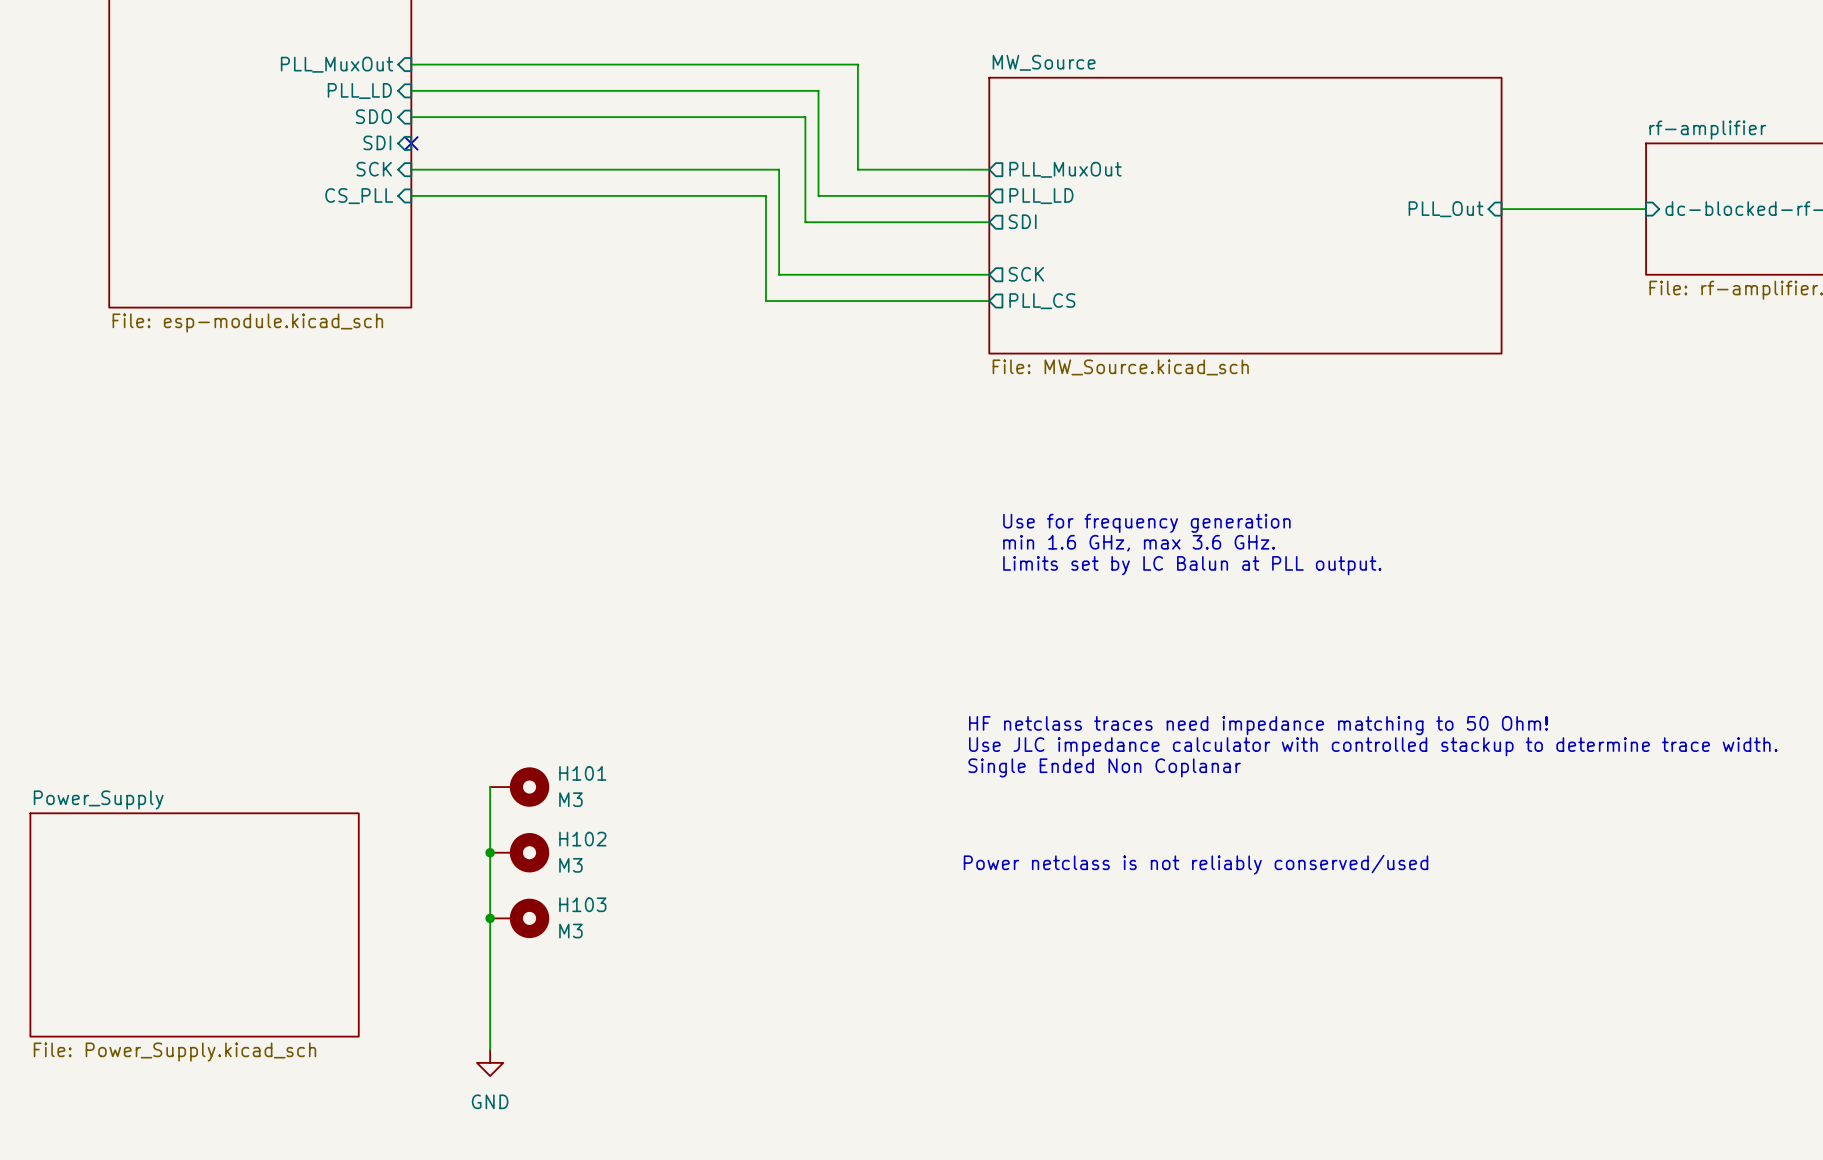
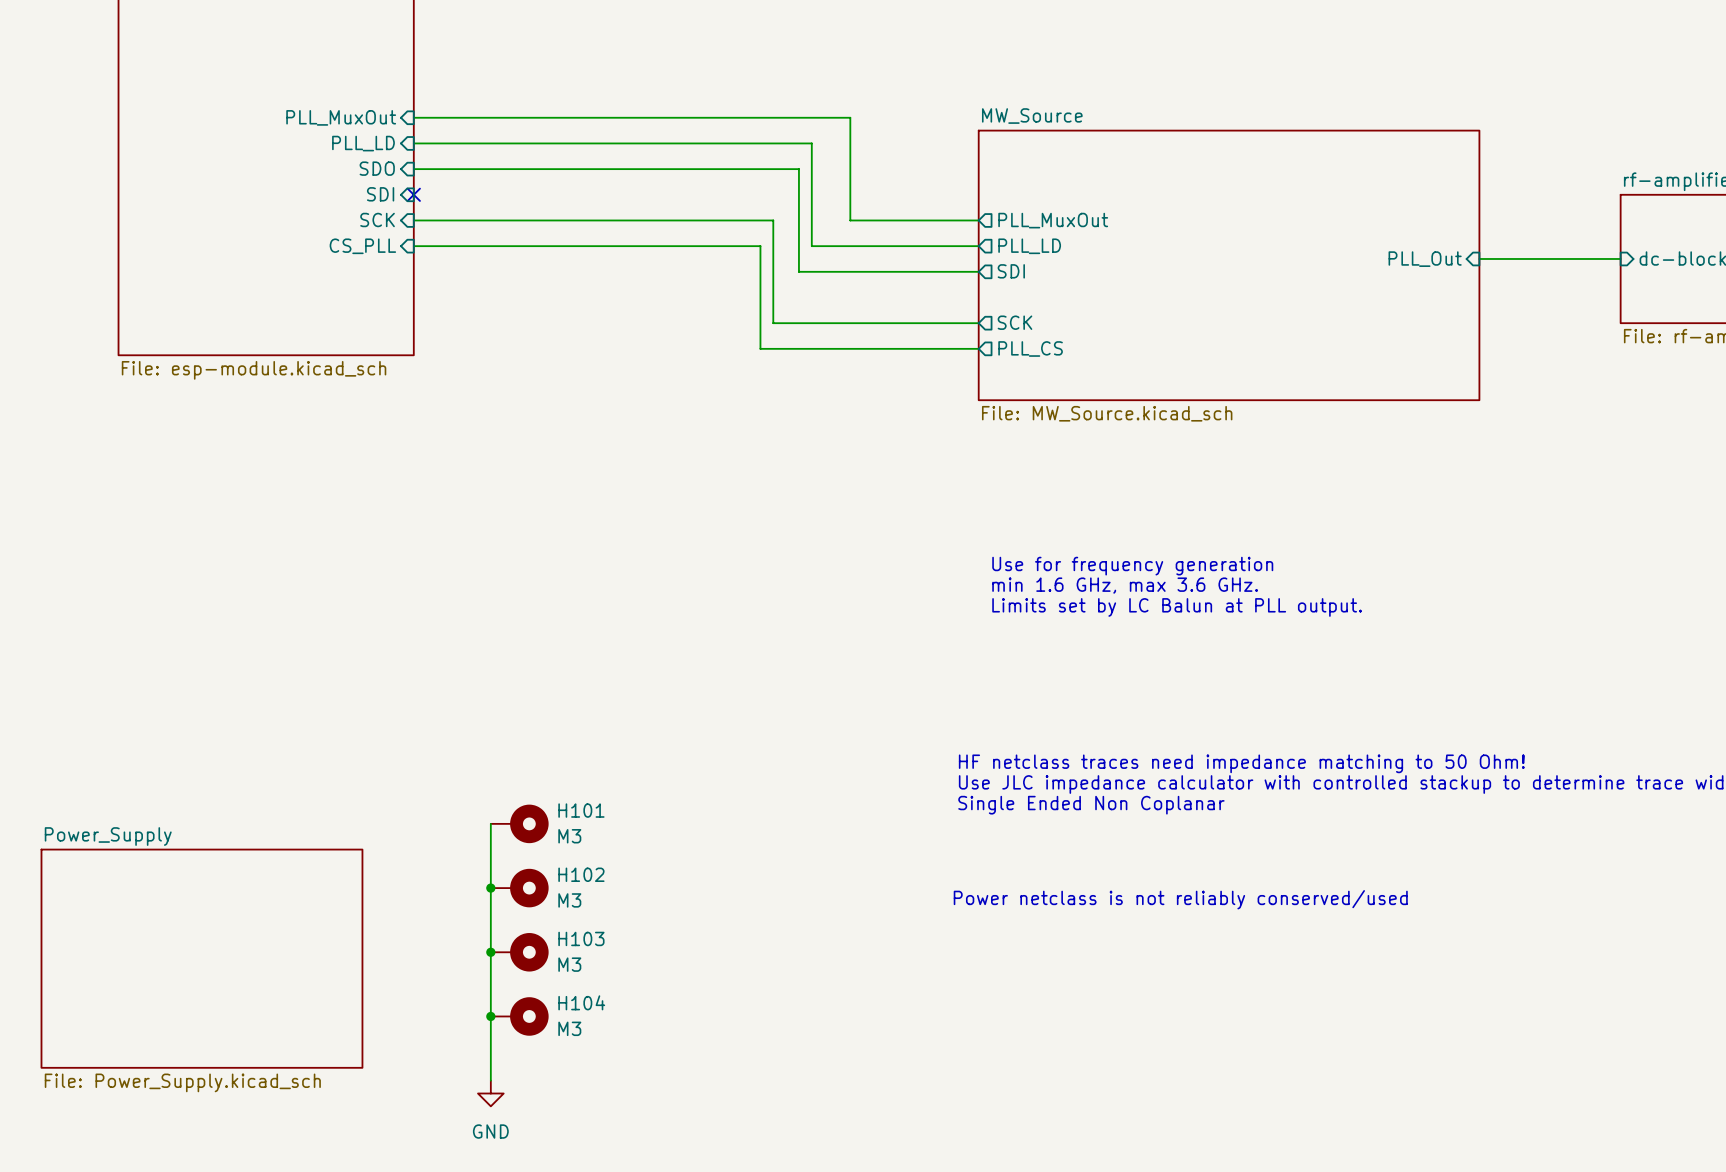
junction: none -> (490, 1016)
H104: none -> M3 (519, 1016)

